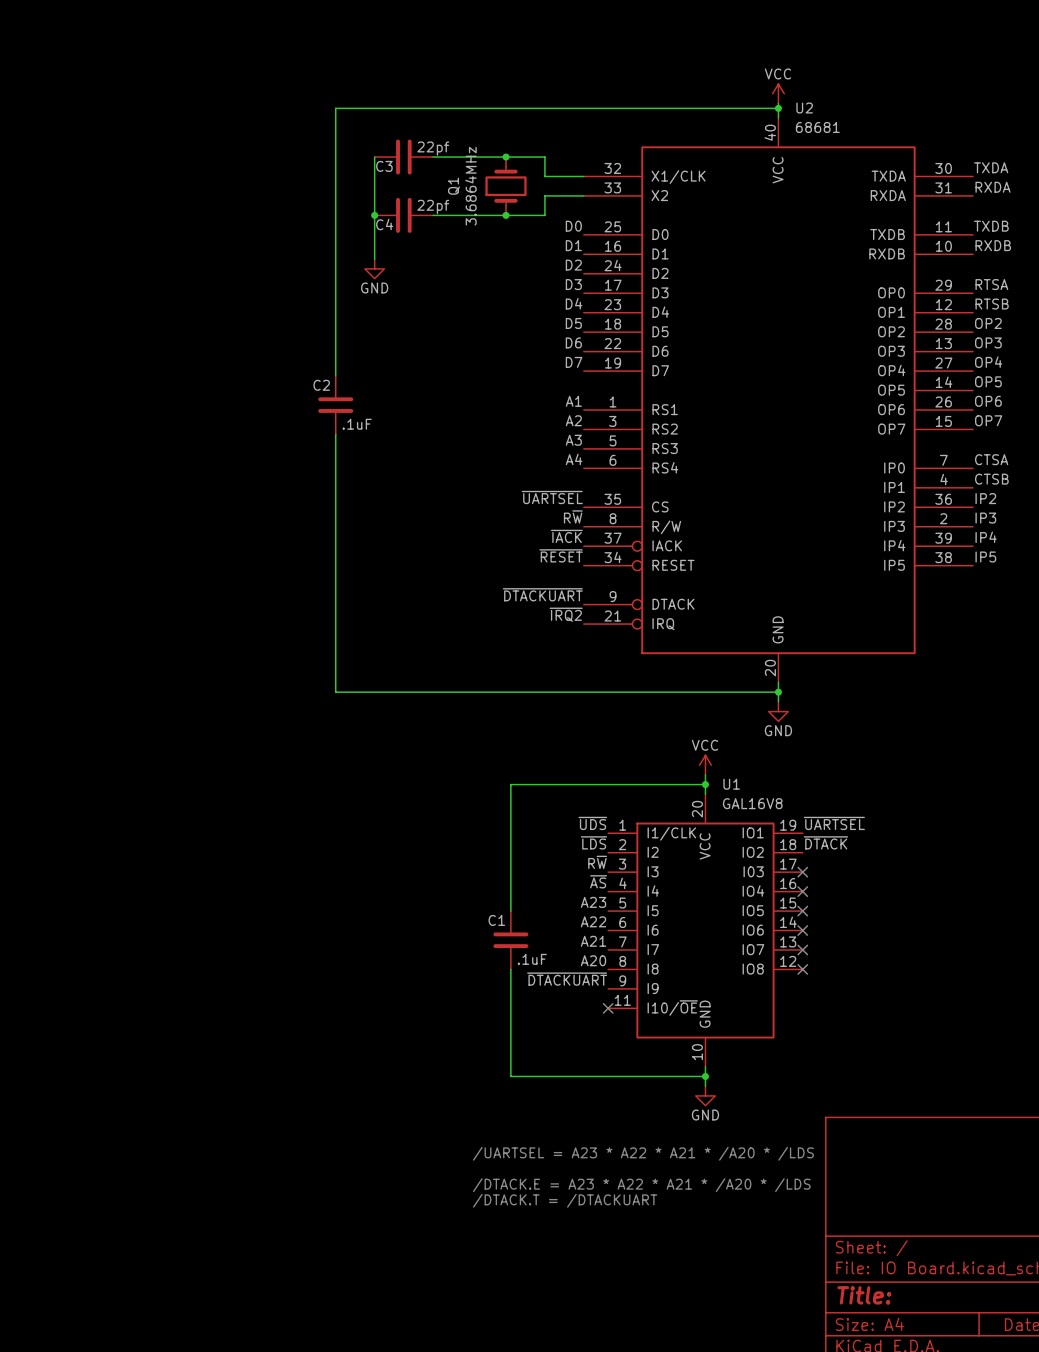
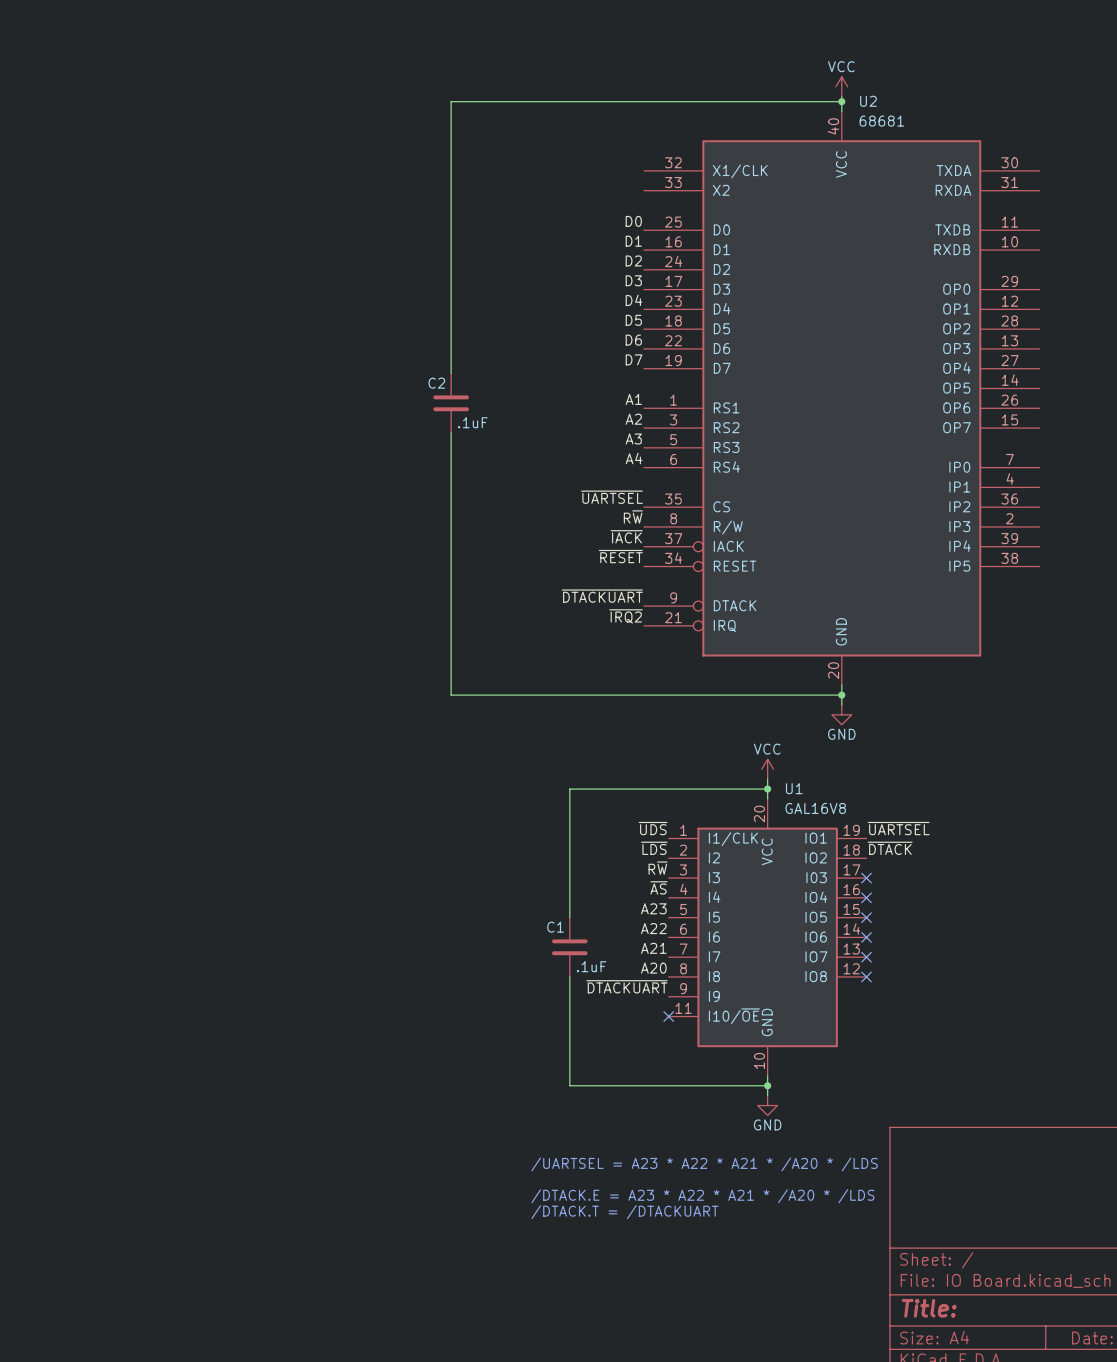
wire: (394, 108) (335, 108) (335, 375) -> (451, 101) (451, 373)
wire: (374, 157) (374, 259) -> none
C3: 22pf (403, 157) -> none
wire: (433, 157) (544, 157) (544, 176) (583, 176) -> none
junction: (506, 157) -> none
label: TXDA (991, 167) -> none
Q1: 3.6864MHz (506, 186) -> none
label: RXDA (993, 187) -> none
wire: (583, 195) (544, 195) (544, 215) (433, 215) -> none
junction: (374, 215) -> none
C4: 22pf (403, 215) -> none
junction: (506, 215) -> none
label: TXDB (991, 226) -> none
label: RXDB (993, 245) -> none
power symbol: GND (374, 268) -> none
label: RTSA (991, 284) -> none
label: RTSB (992, 304) -> none
label: OP2 (988, 323) -> none
label: OP3 (988, 342) -> none
label: OP4 (988, 362) -> none
label: OP5 (988, 381) -> none
label: OP6 (988, 401) -> none
C2 position: (335, 405) -> (451, 403)
label: OP7 (988, 420) -> none
wire: (335, 434) (335, 692) (394, 692) -> (451, 433) (451, 695)
label: CTSA (991, 459) -> none
label: CTSB (991, 479) -> none
label: IP2 (985, 498) -> none
label: IP3 (985, 518) -> none
label: IP4 (986, 537) -> none
label: IP5 (985, 556) -> none

